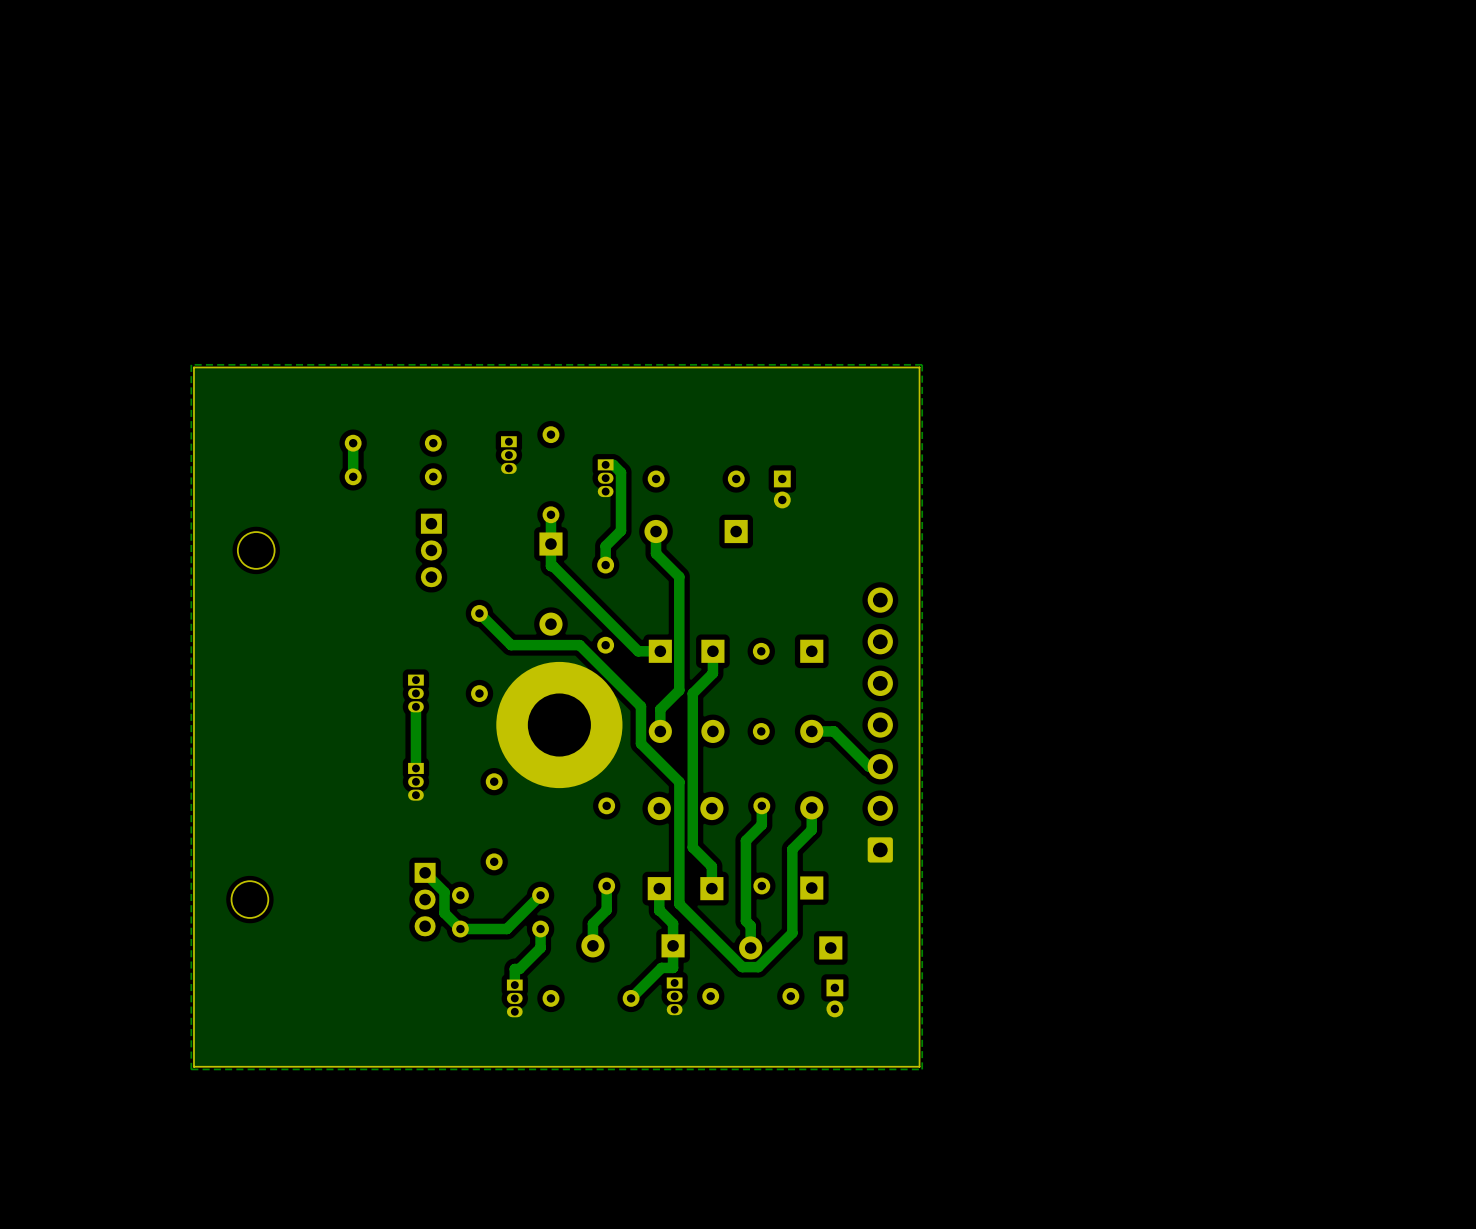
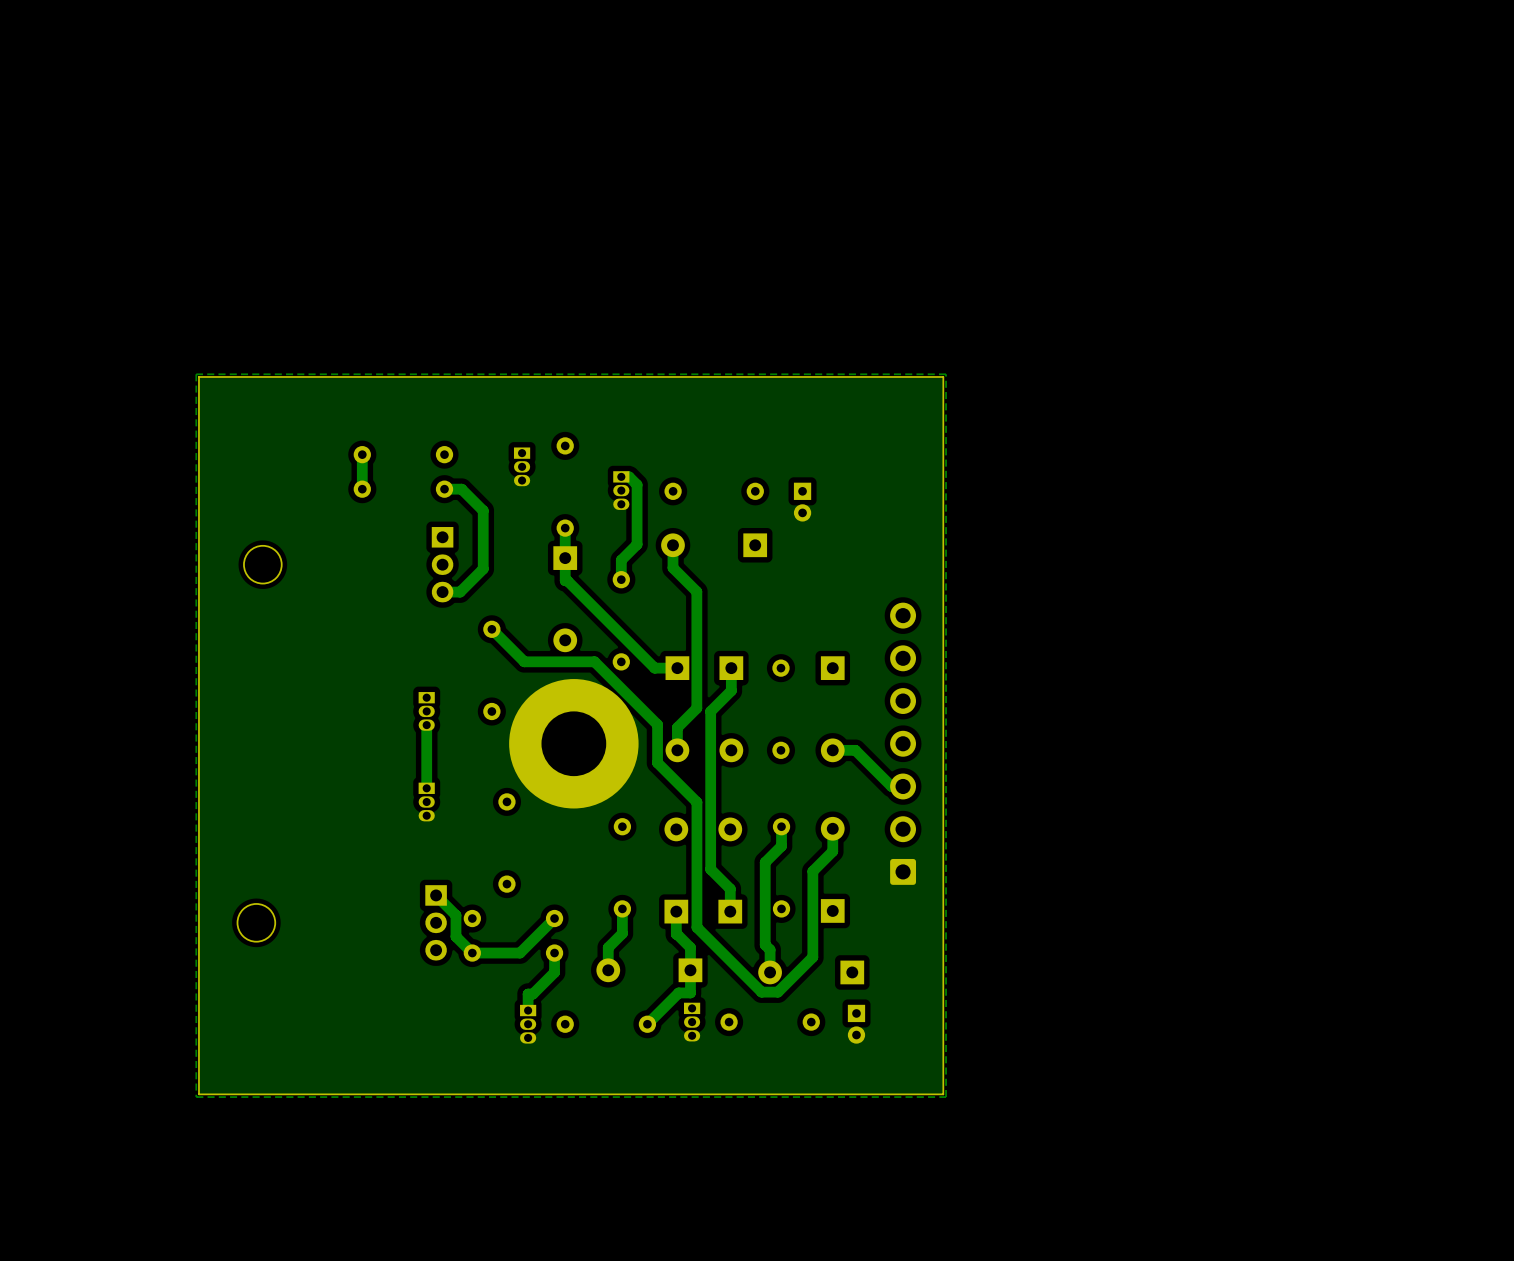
track: none -> (444, 489) (461, 489) (483, 510) (483, 569) (460, 592) (442, 592)

